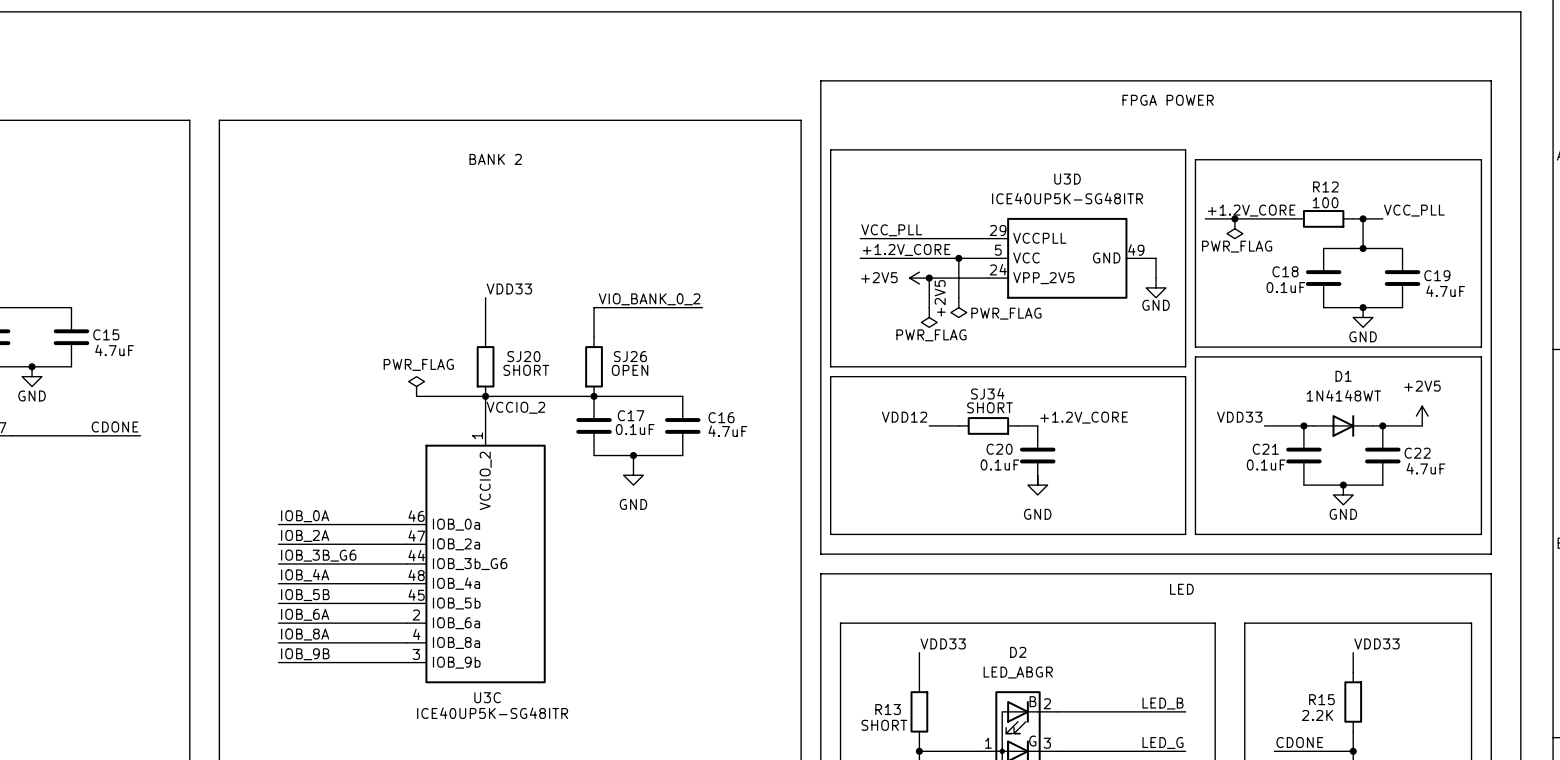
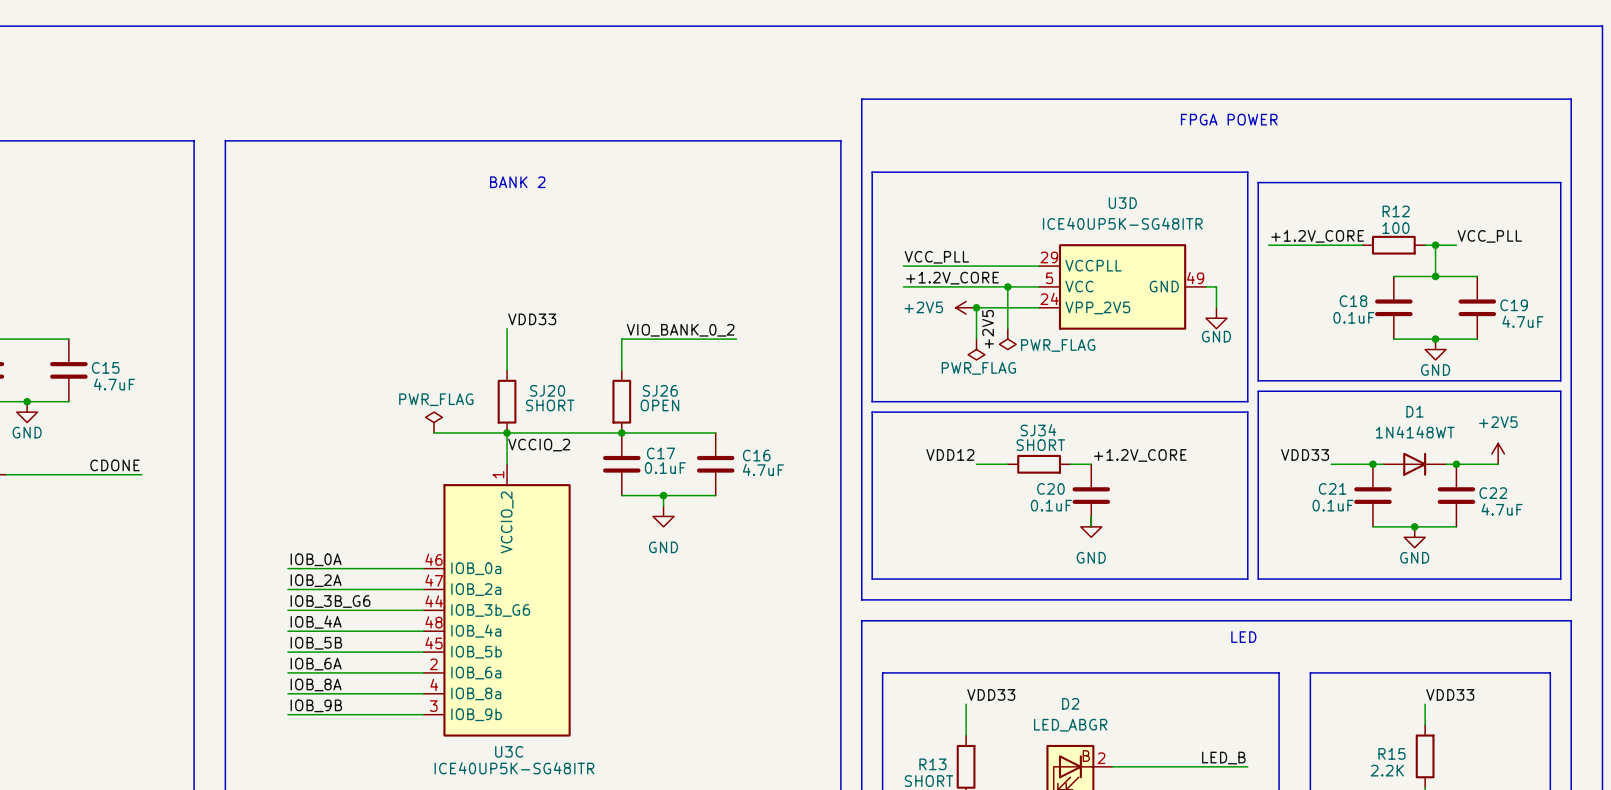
junction: (1234, 218) -> none
power symbol: PWR_FLAG (1234, 228) -> none

